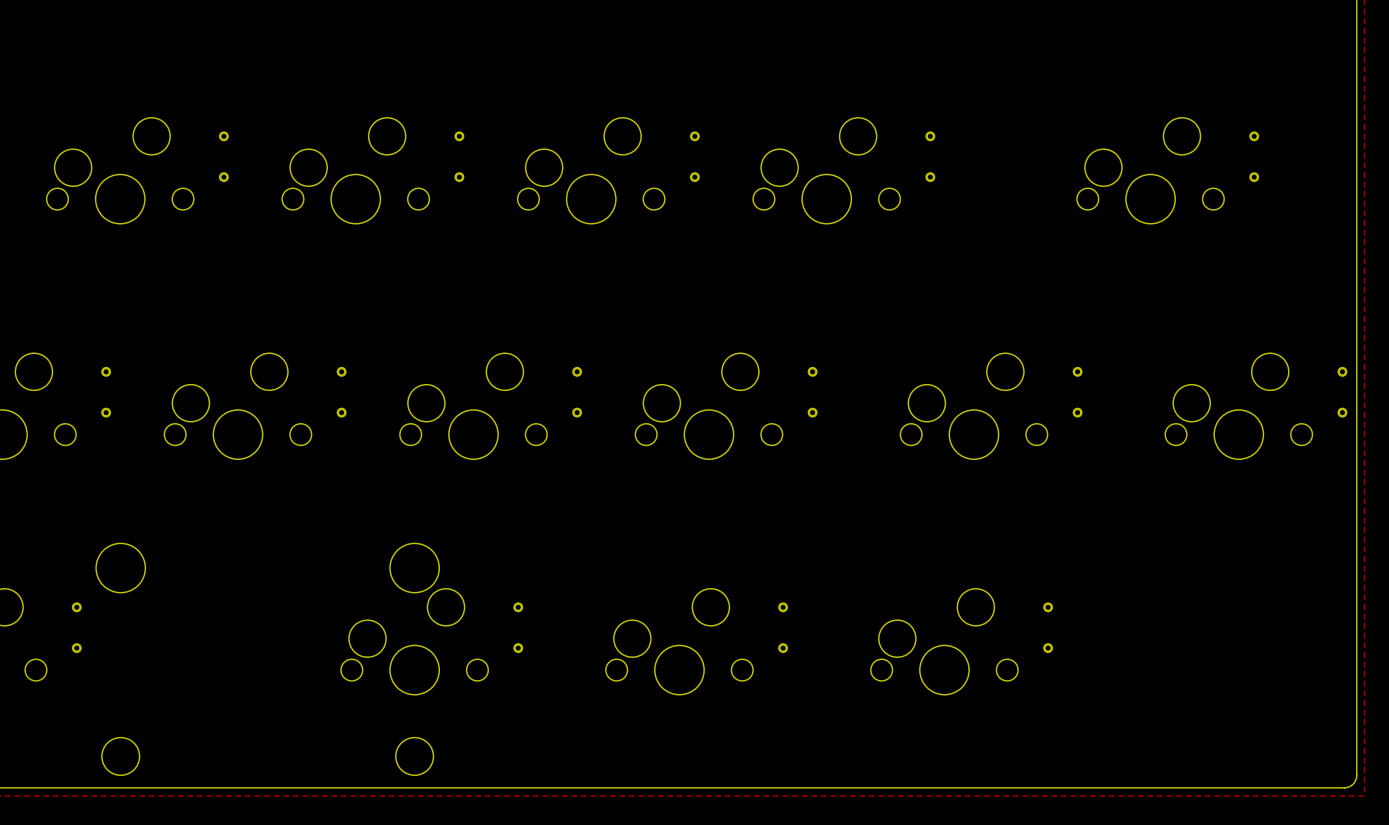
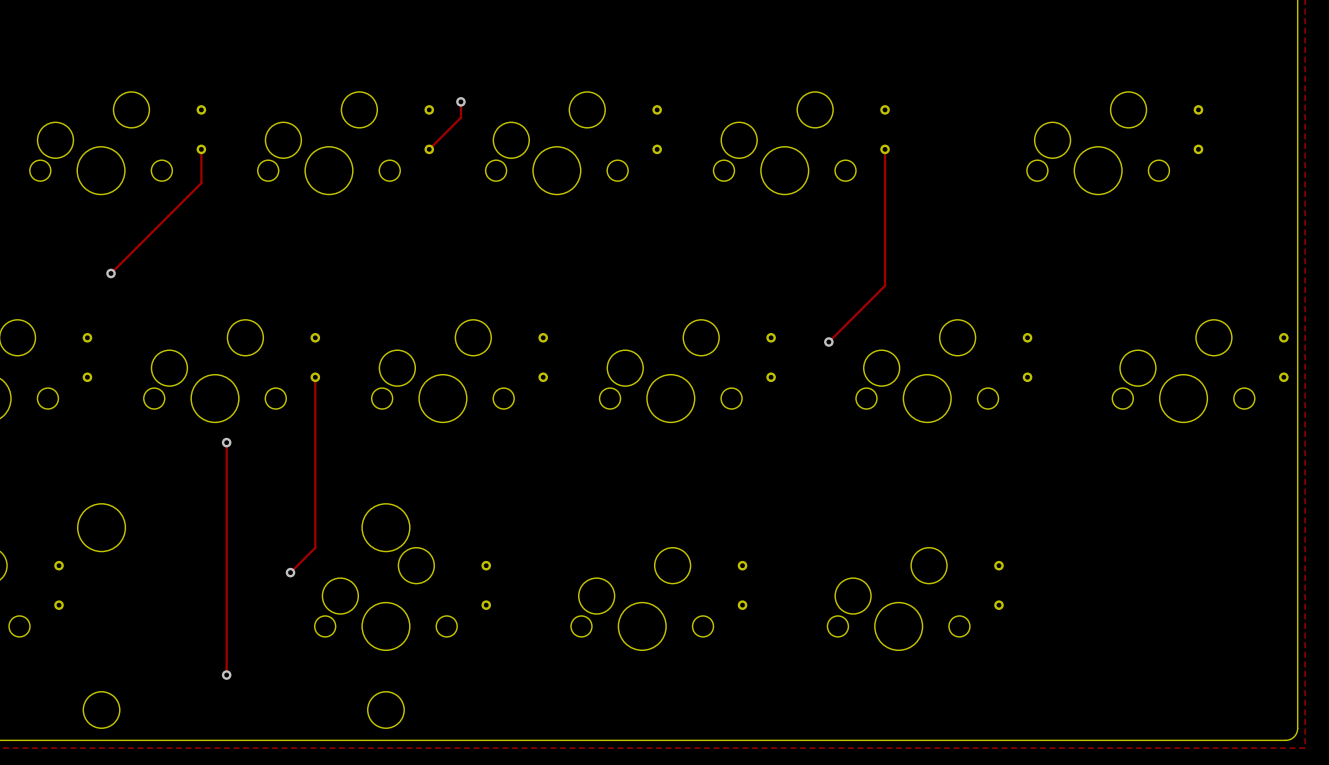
track: none -> (460, 101) (460, 117) (429, 149)
via: none -> (460, 101)
track: none -> (201, 149) (201, 183) (111, 273)
track: none -> (885, 149) (885, 285) (828, 342)
via: none -> (111, 273)
via: none -> (828, 342)
track: none -> (315, 377) (315, 547) (290, 572)
track: none -> (226, 442) (226, 675)
via: none -> (226, 442)
via: none -> (290, 572)
via: none -> (226, 675)

